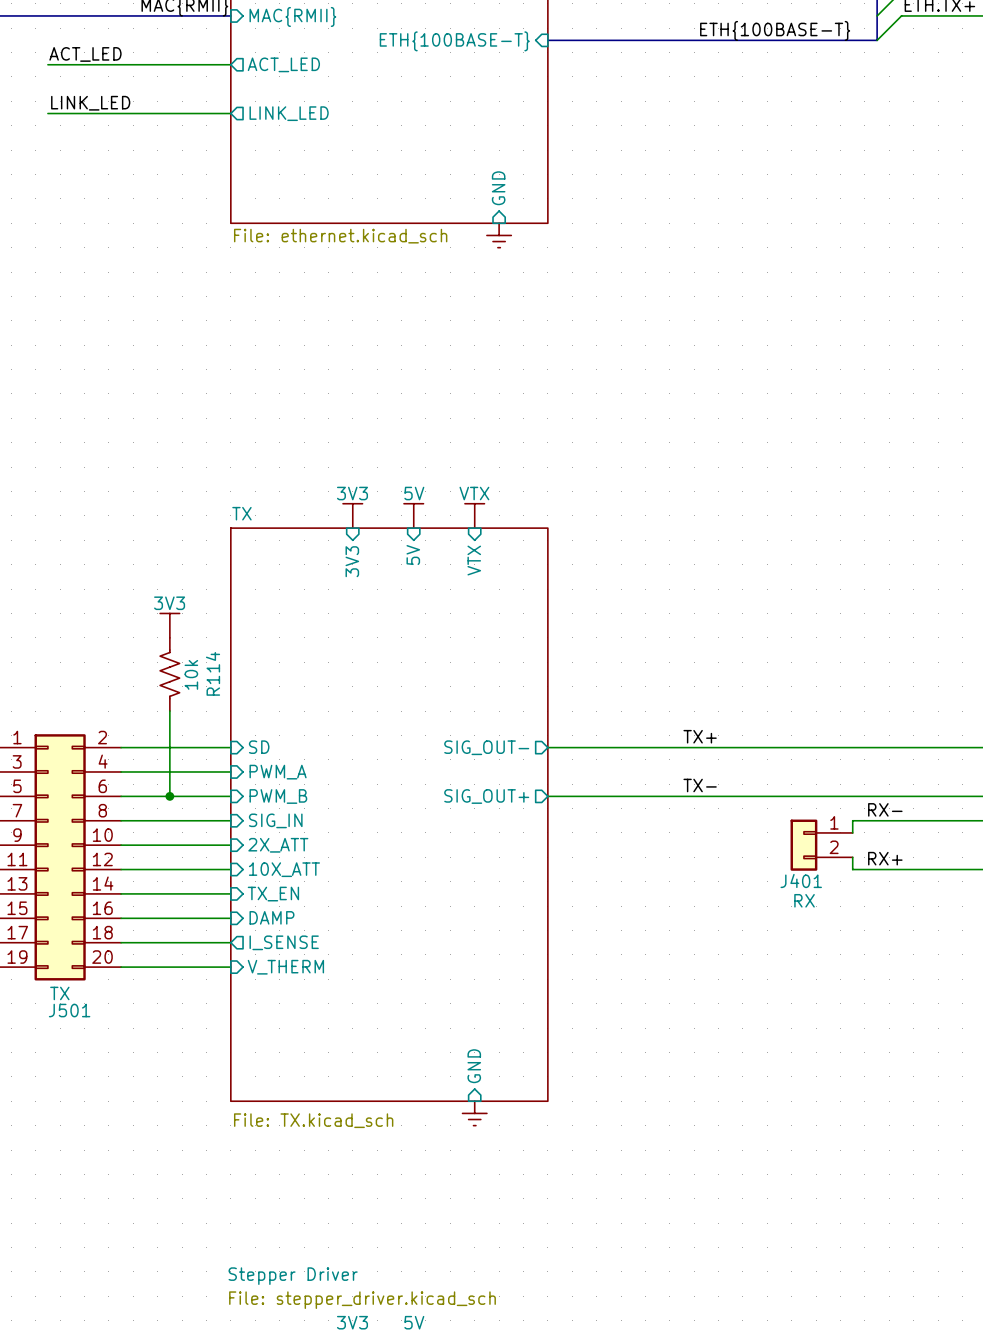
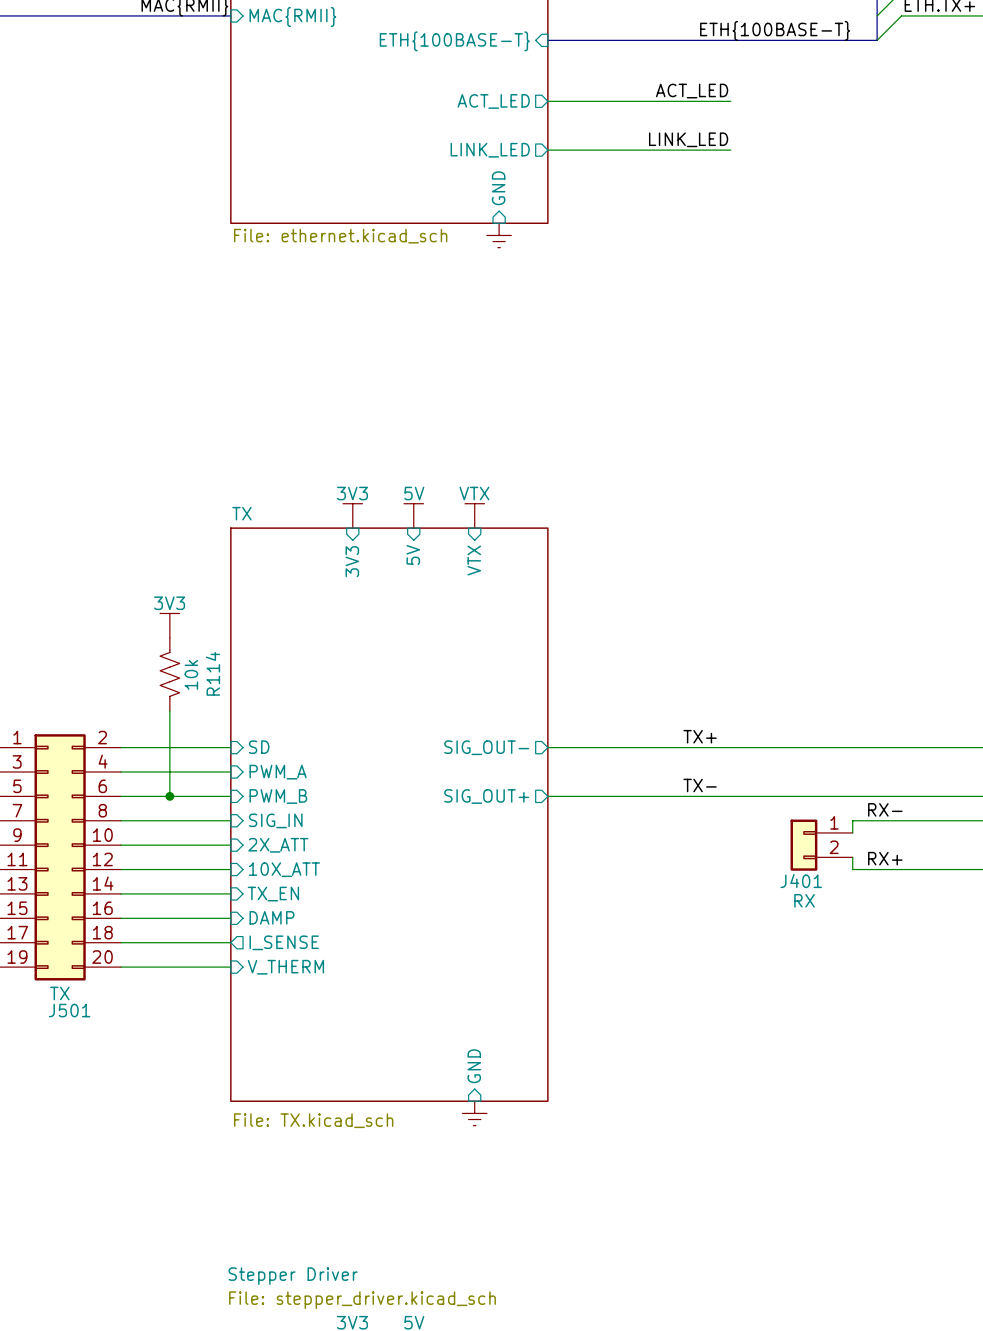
label: ACT_LED (85, 54) -> none
wire: (47, 64) (230, 64) -> none
sheet pin: ACT_LED (283, 64) -> none
label: none -> ACT_LED (692, 91)
sheet pin: none -> ACT_LED (493, 101)
wire: none -> (547, 101) (730, 101)
label: LINK_LED (90, 103) -> none
wire: (47, 113) (230, 113) -> none
sheet pin: LINK_LED (289, 113) -> none
label: none -> LINK_LED (688, 139)
sheet pin: none -> LINK_LED (490, 150)
wire: none -> (547, 150) (730, 150)

